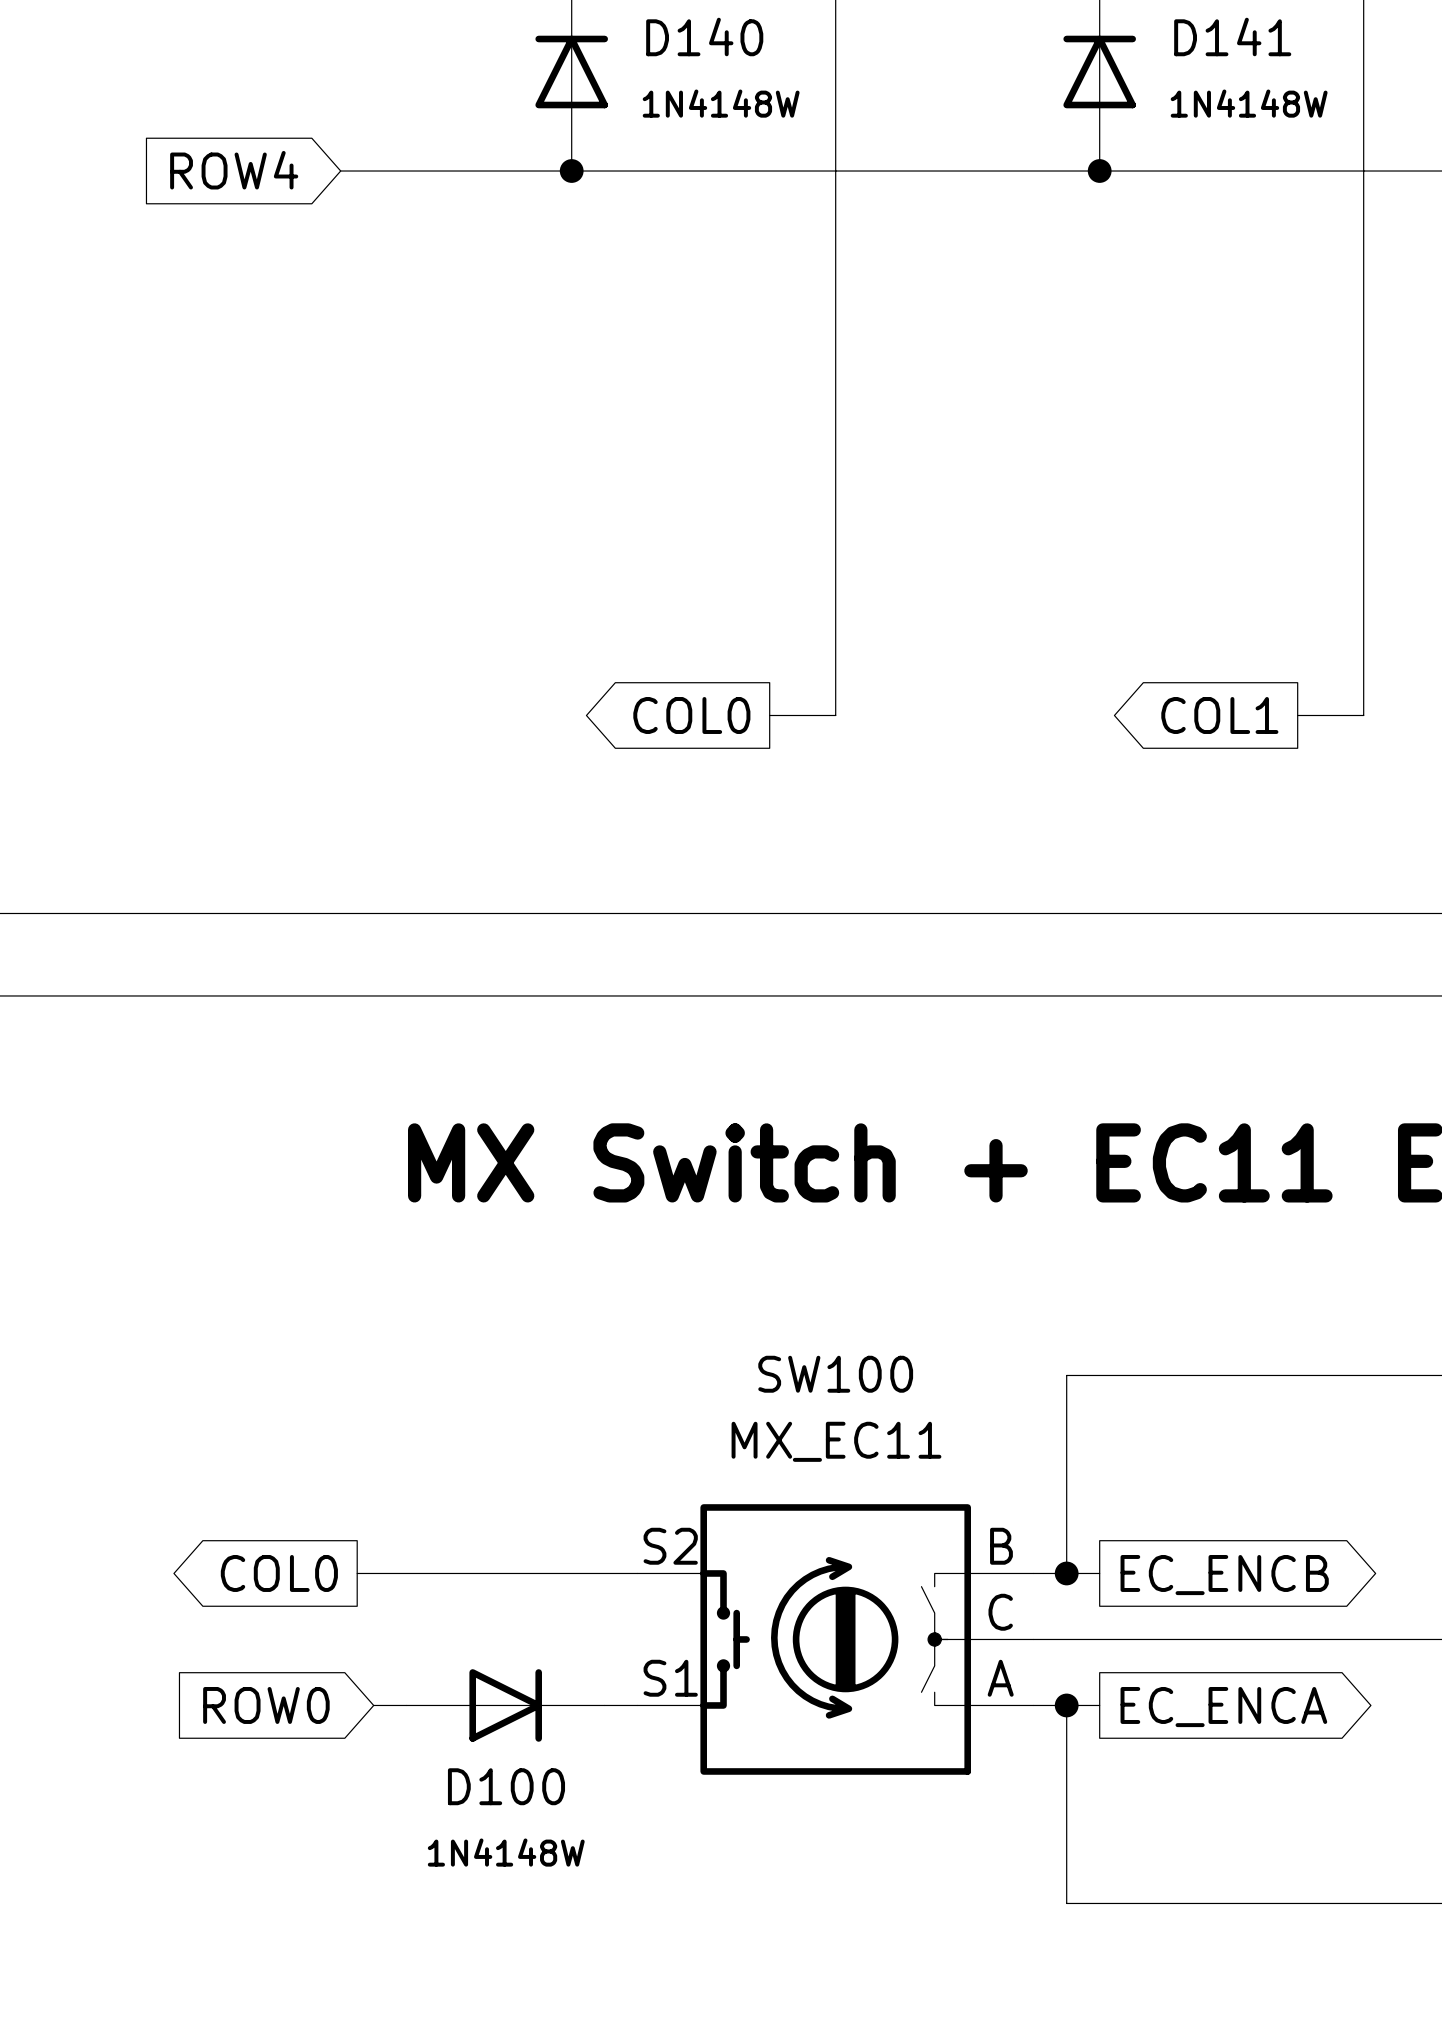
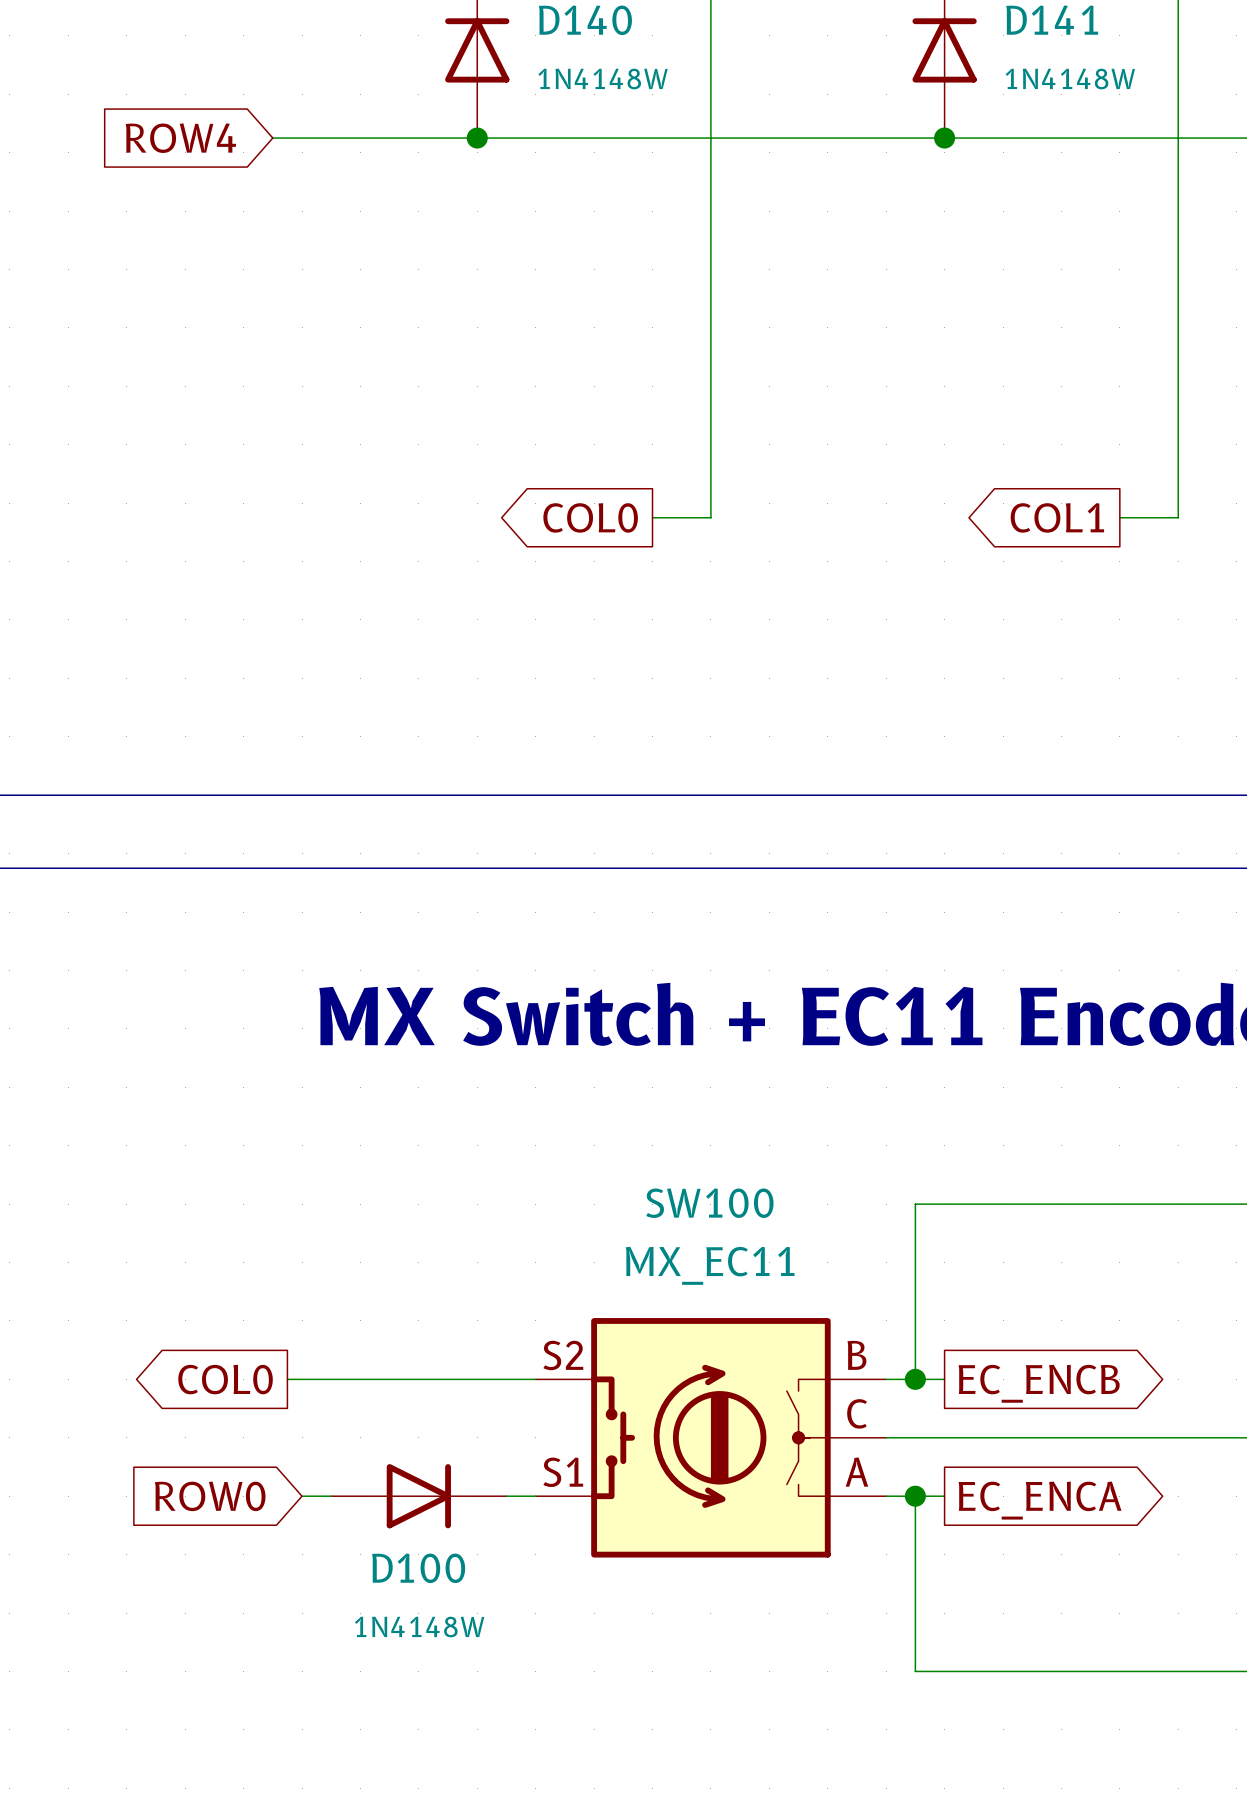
wire: (835, 599) (835, 715) (769, 715) -> (710, 517) (652, 517)
wire: (1363, 599) (1363, 715) (1297, 715) -> (1178, 517) (1119, 517)
global label position: COL0 (691, 715) -> COL0 (590, 517)
global label position: COL1 (1219, 715) -> COL1 (1057, 517)

